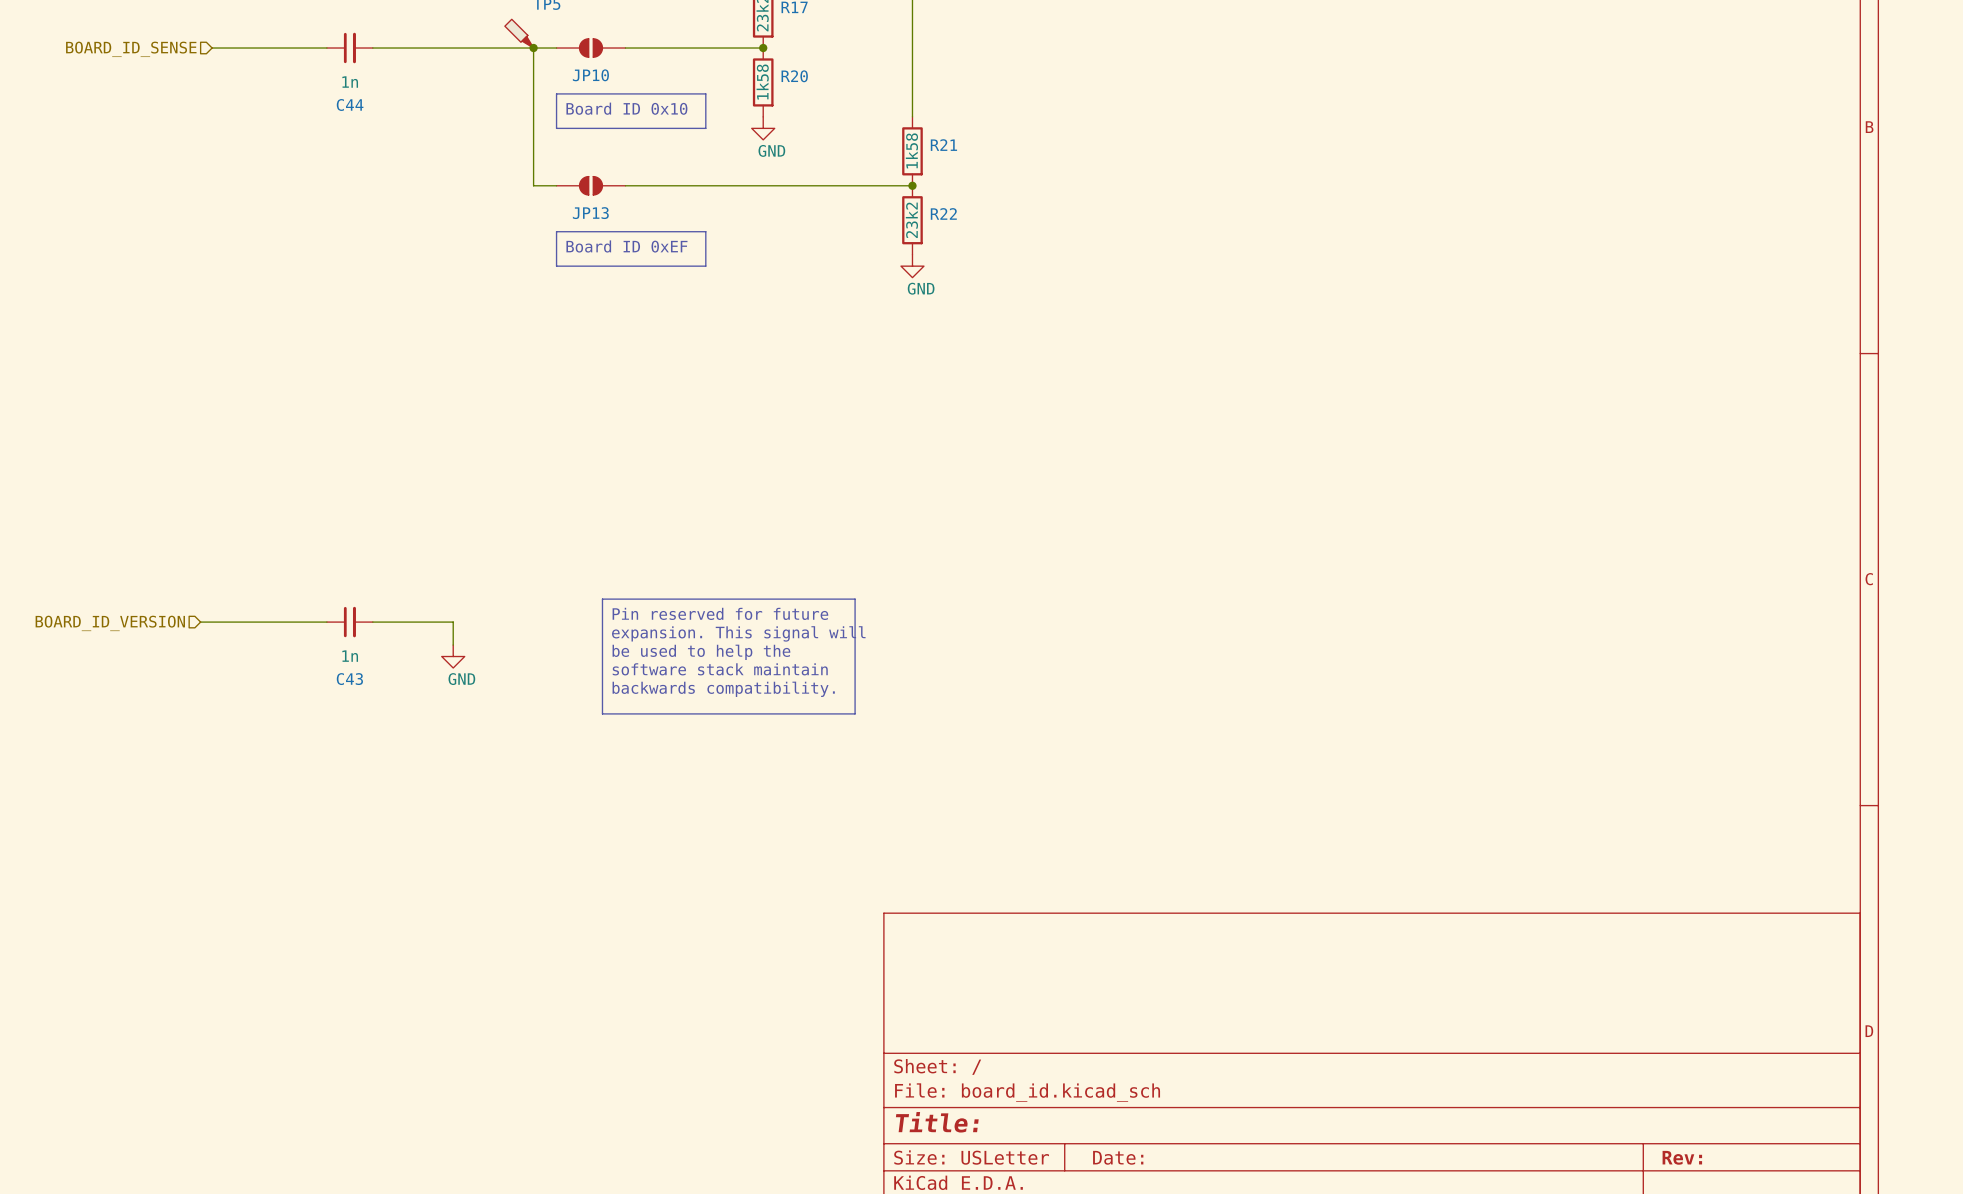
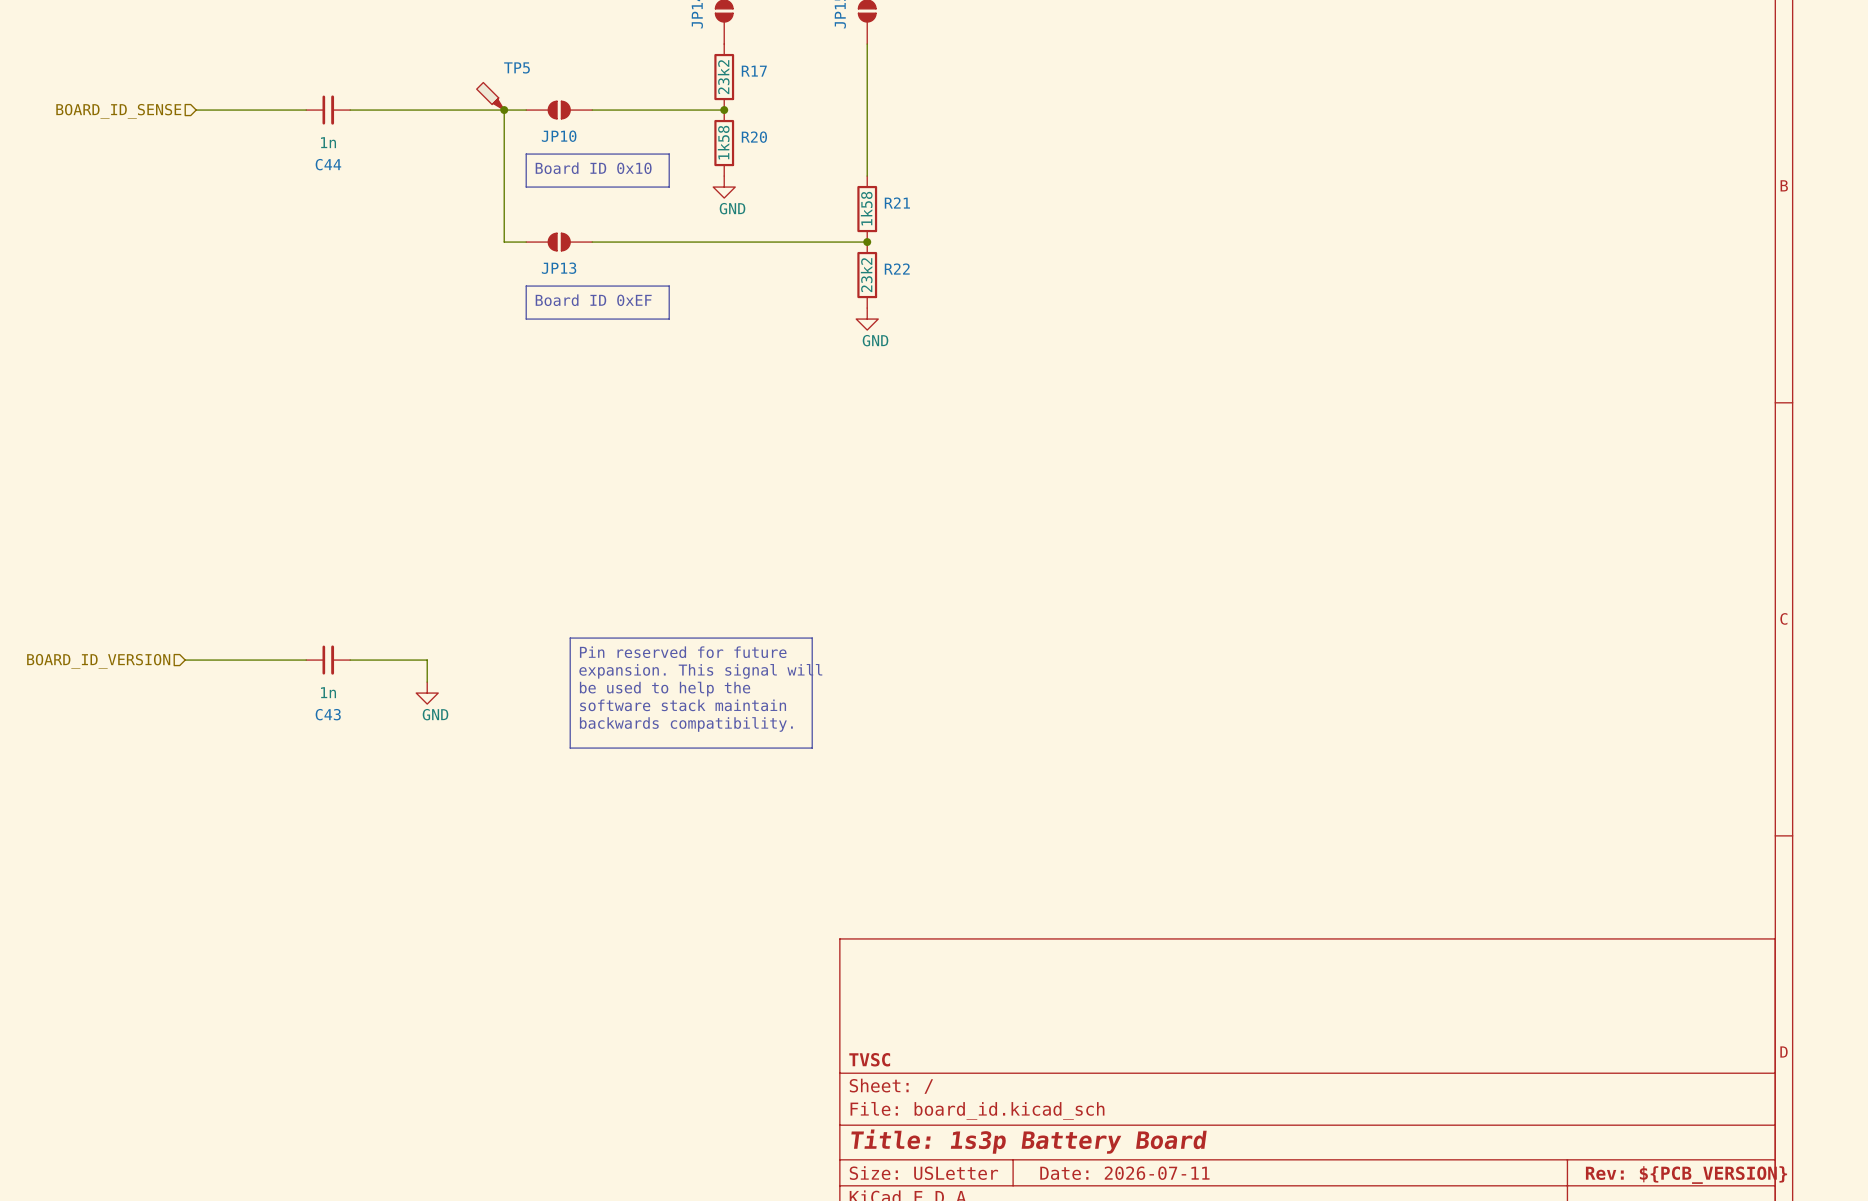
title block: none -> TVSC (869, 1059)
title block: Title: (937, 1122) -> Title: 1s3p Battery Board (1029, 1141)
title block: Date: (1118, 1157) -> Date: 2026-07-11 (1124, 1173)
title block: Rev: (1682, 1157) -> Rev: ${PCB_VERSION} (1686, 1175)

